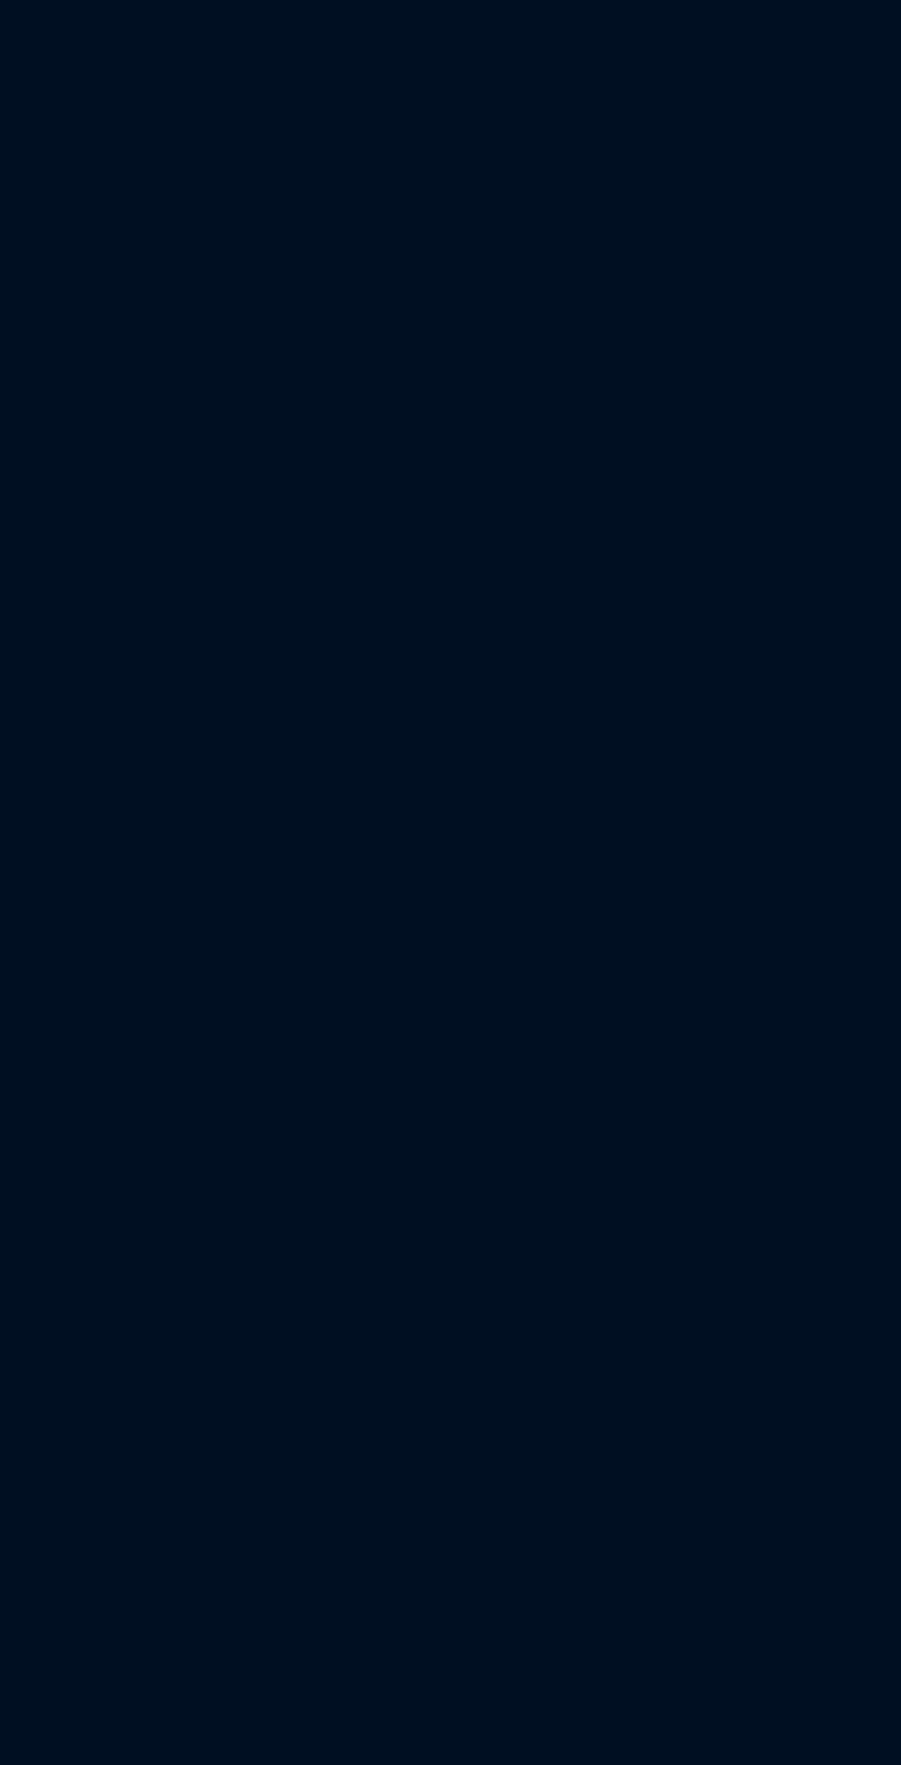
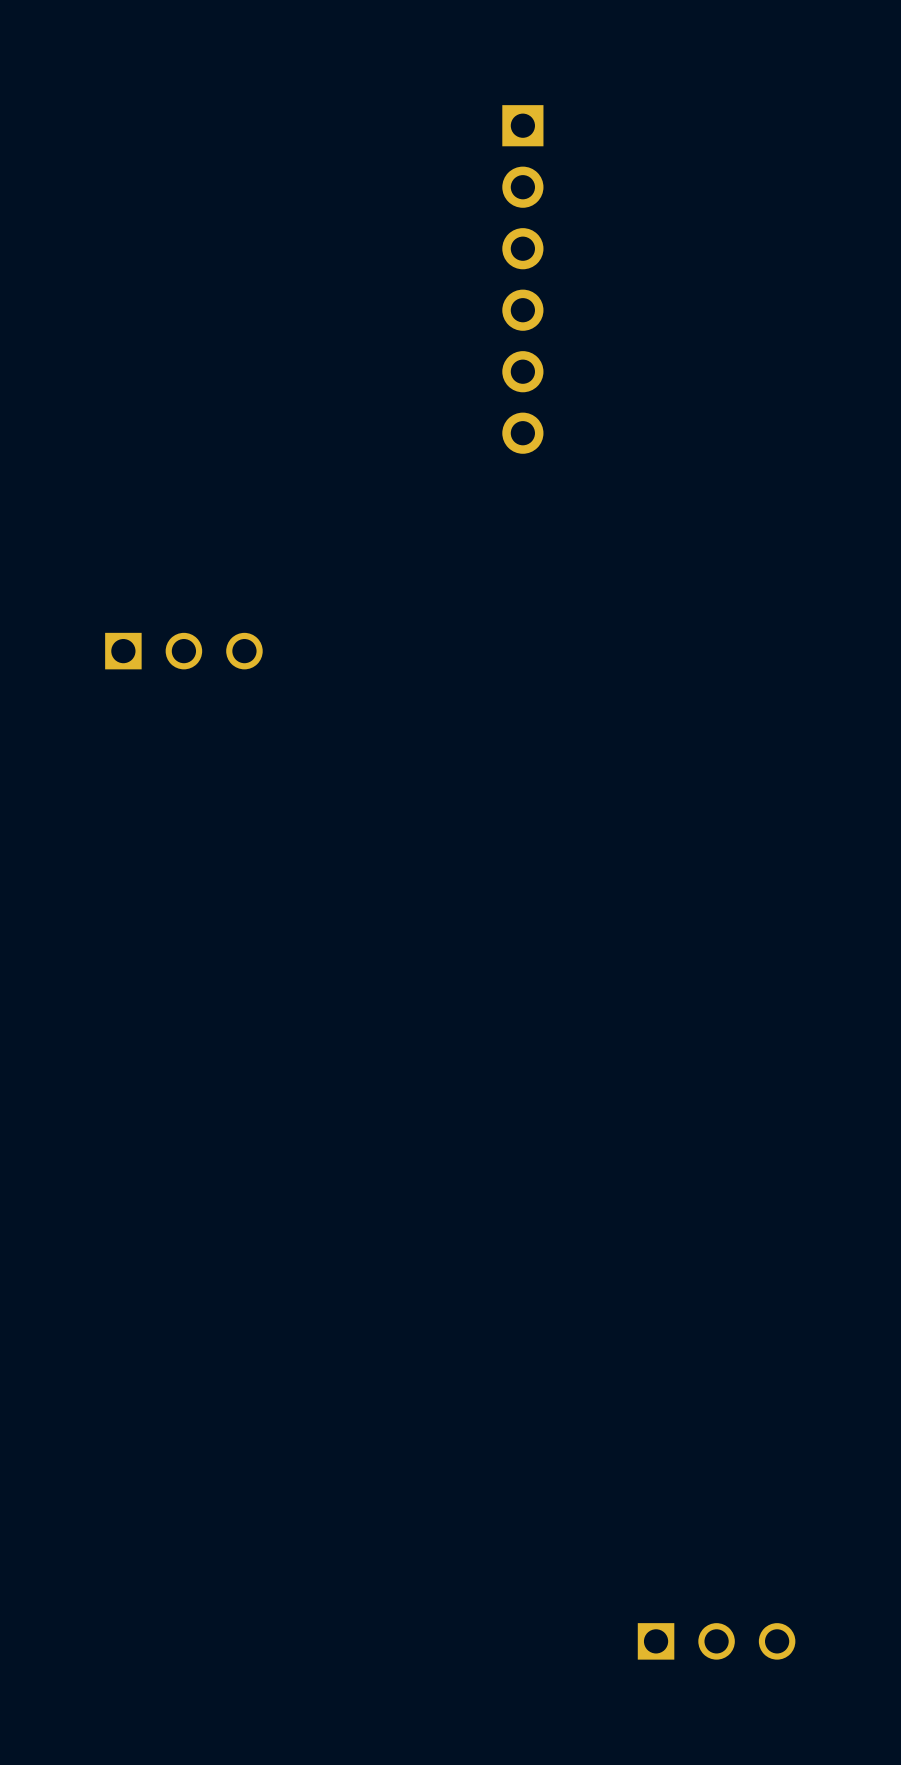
part: none -> (522, 279)
part: none -> (183, 651)
part: none -> (716, 1641)

